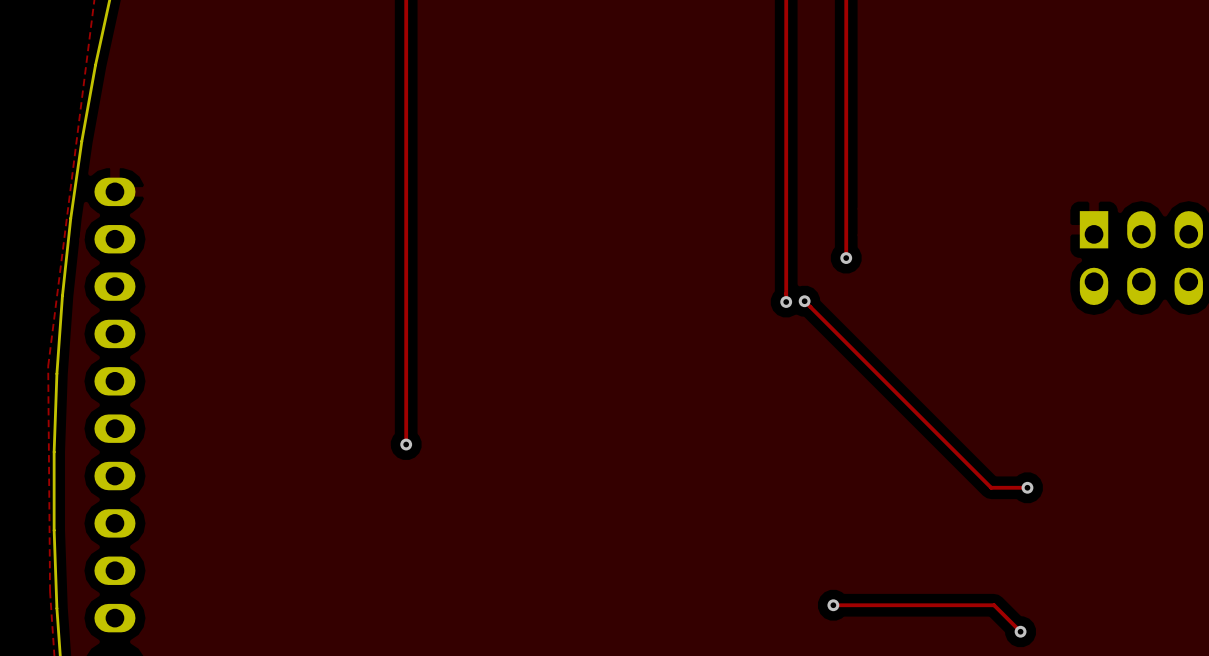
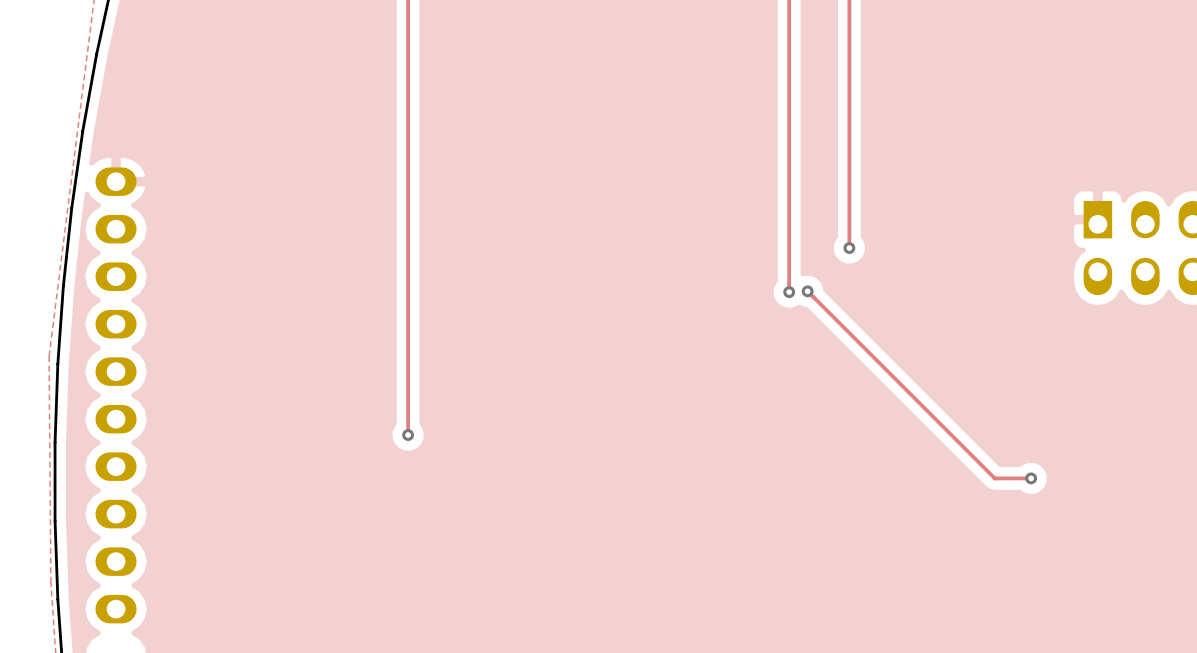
track: (833, 605) (994, 605) (1020, 631) -> none
via: (833, 605) -> none
via: (1020, 631) -> none

